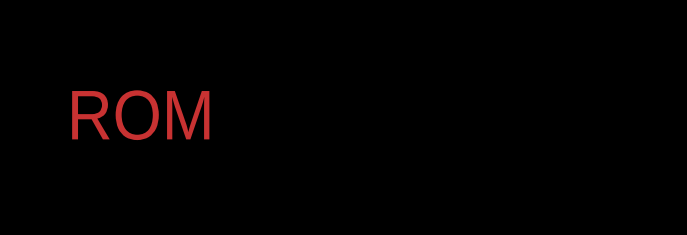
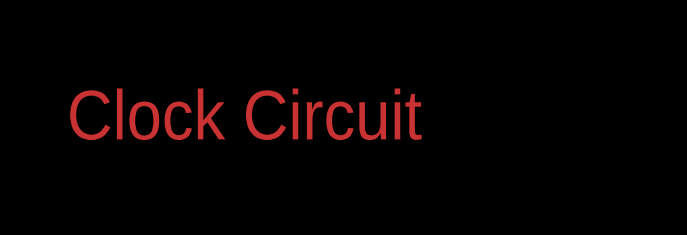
text: ROM (140, 115) -> Clock Circuit (245, 114)

